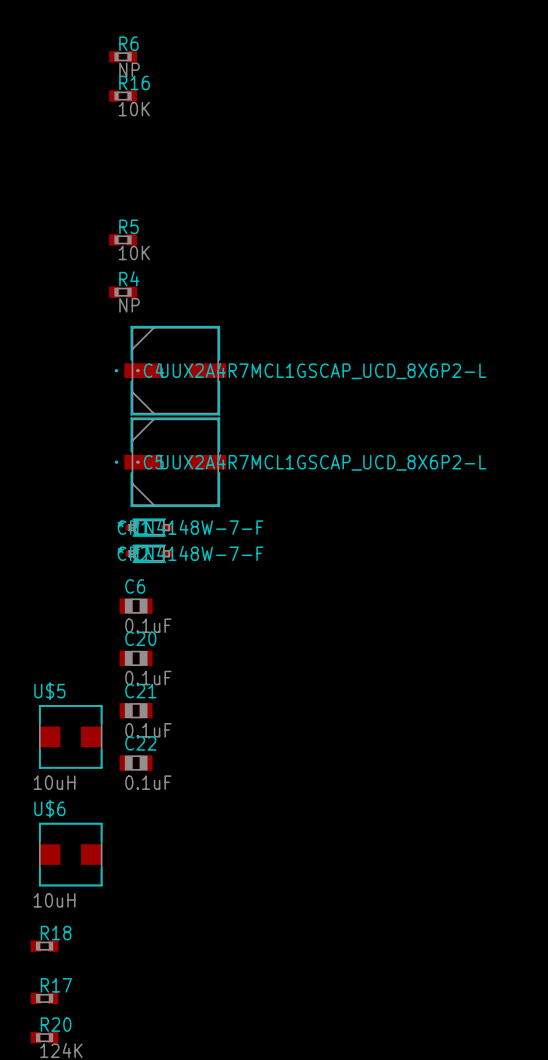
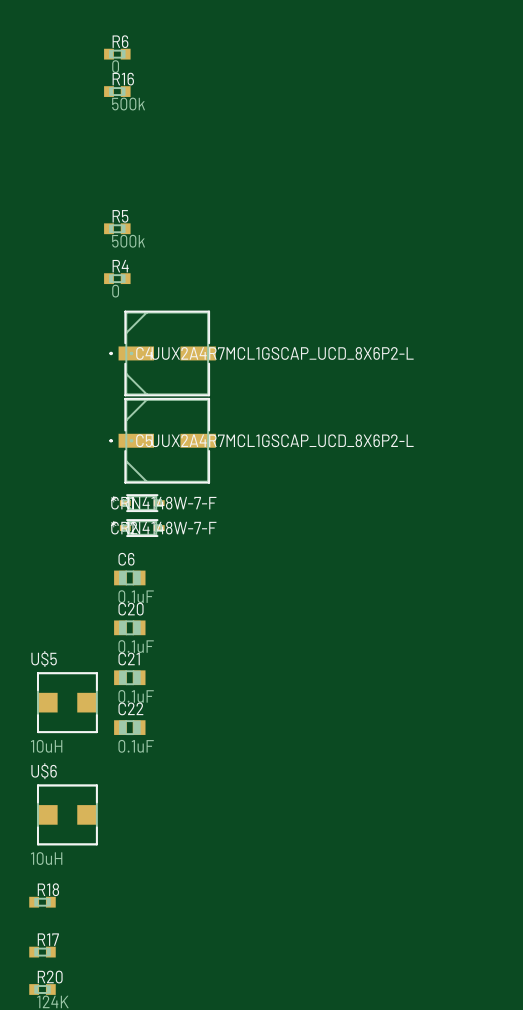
R6 value: NP (129, 69) -> 0 (115, 66)
R16 value: 10K (134, 109) -> 500k (128, 104)
R5 value: 10K (134, 252) -> 500k (128, 241)
R4 value: NP (129, 305) -> 0 (115, 291)

